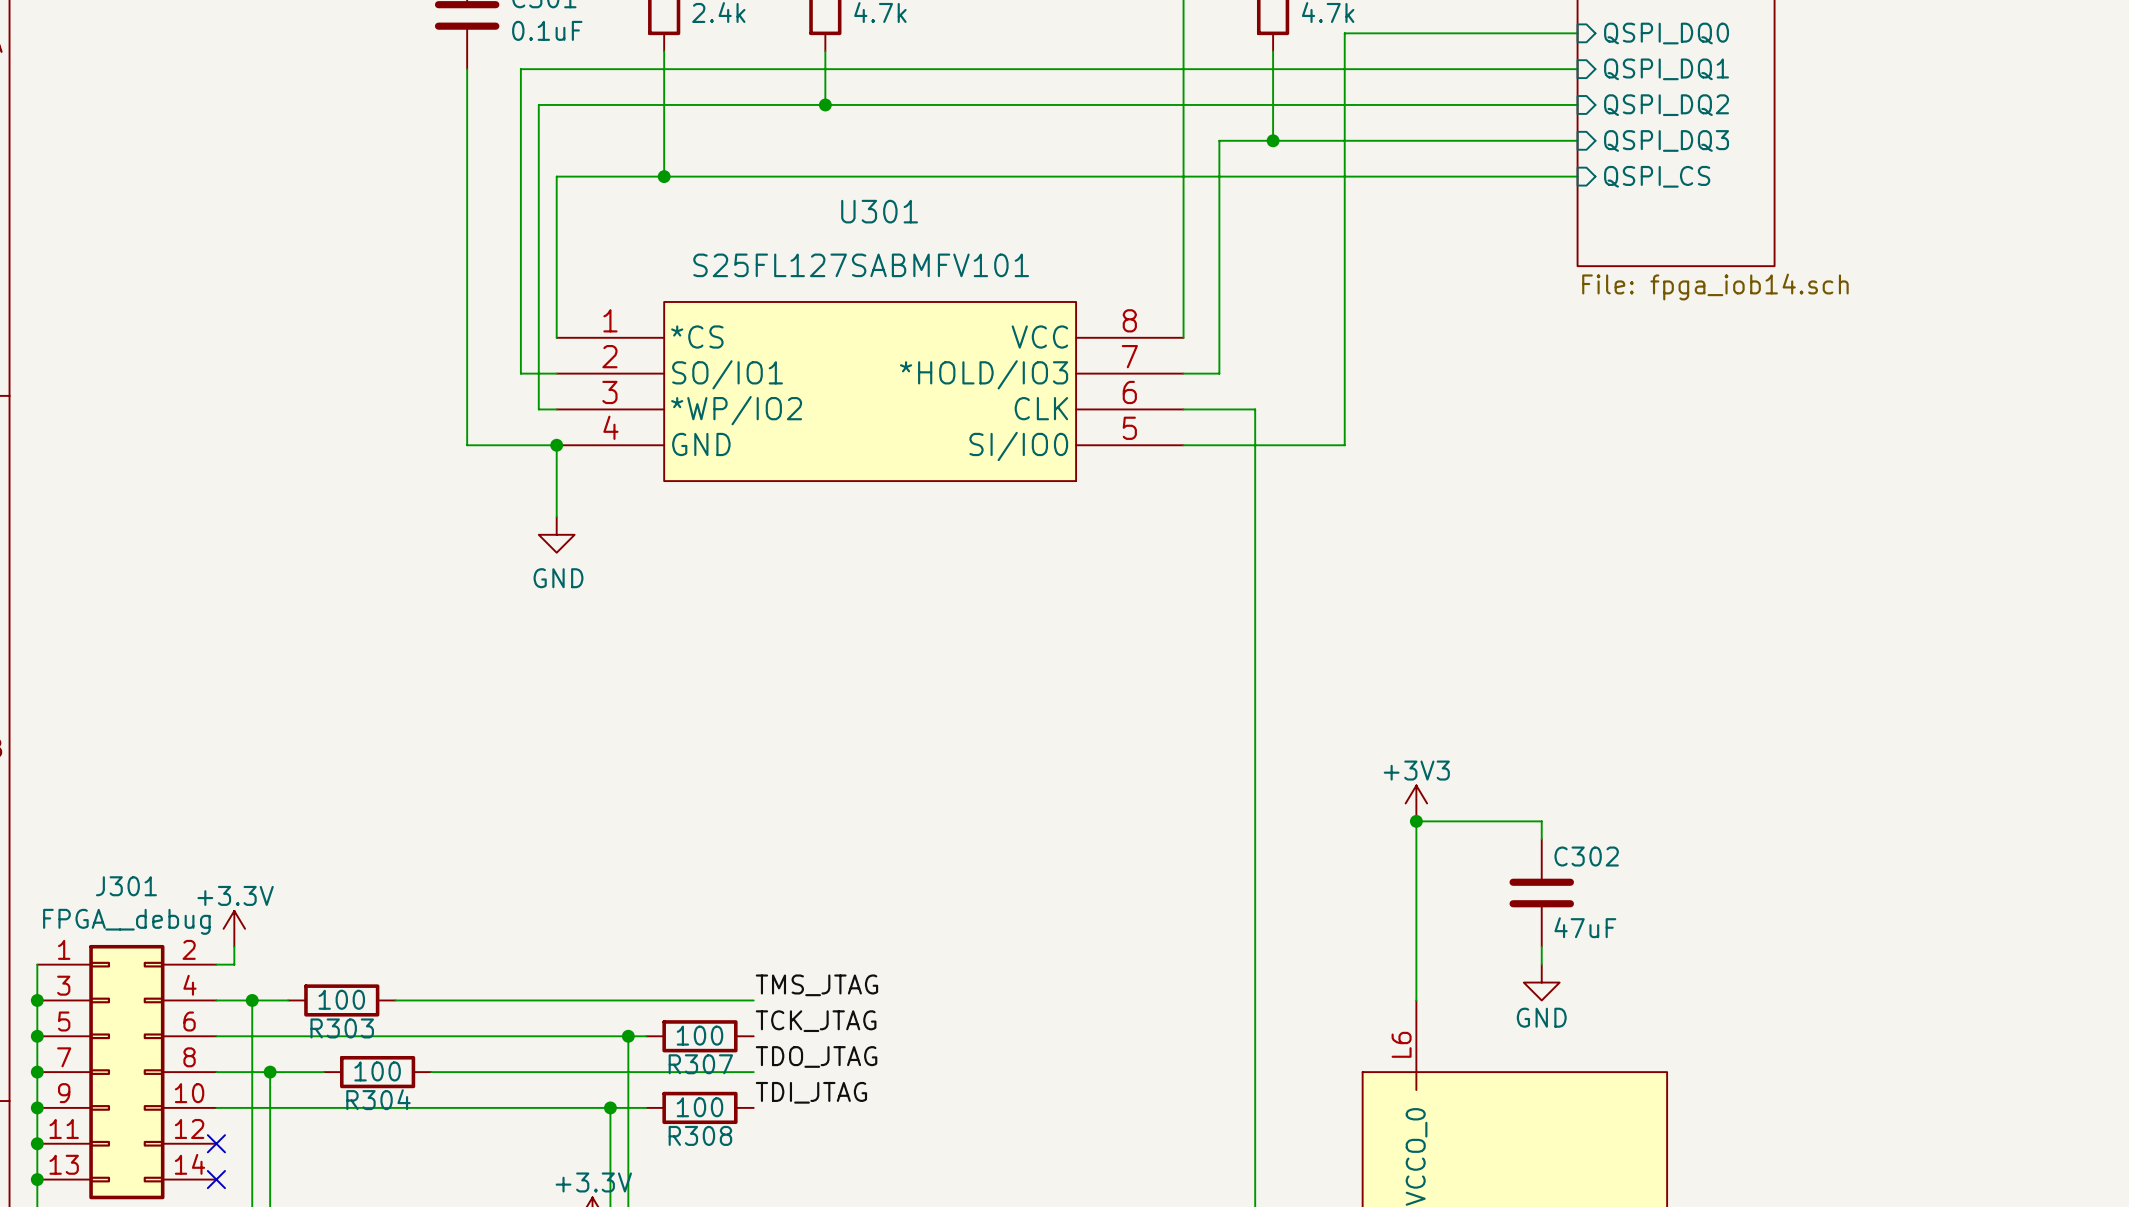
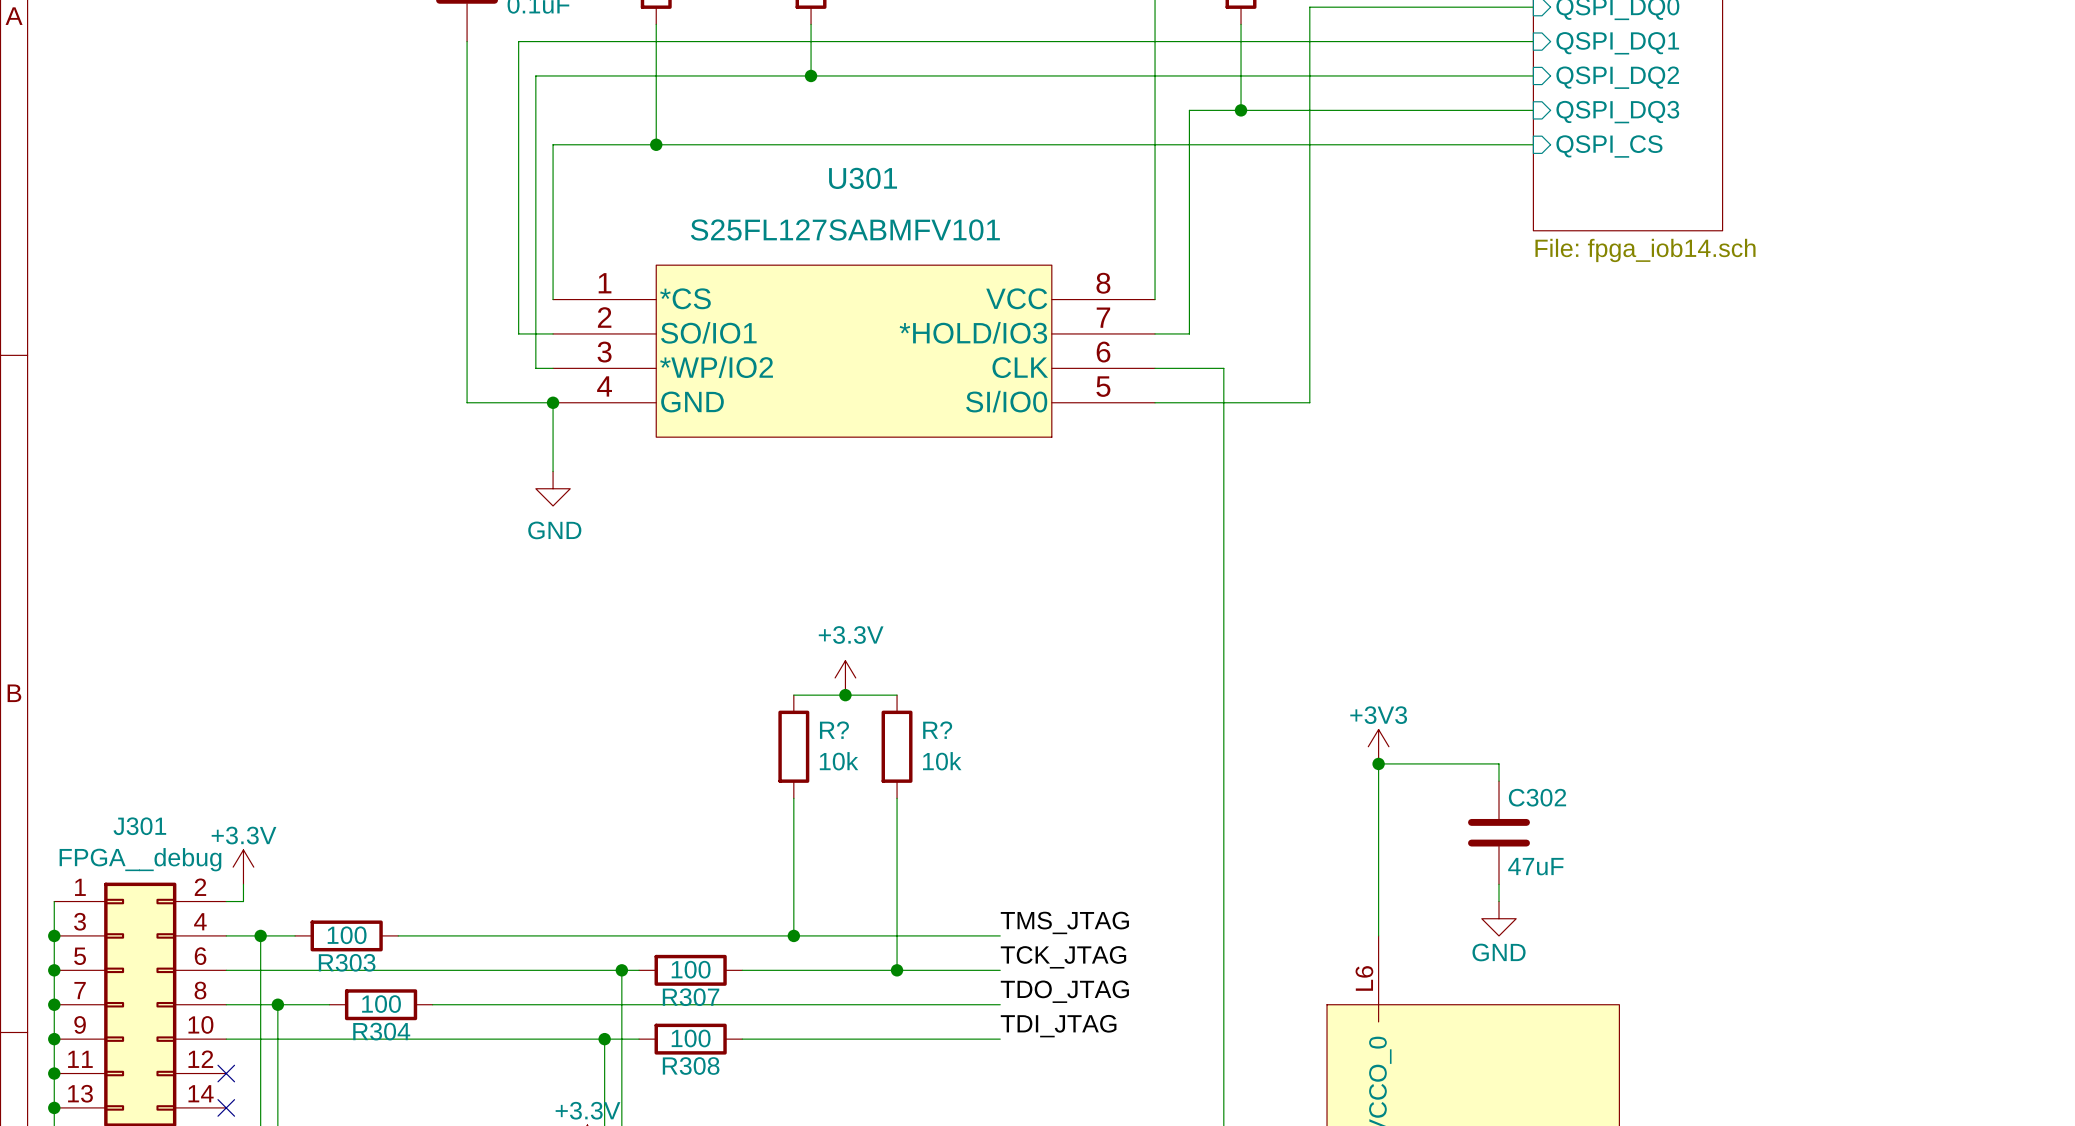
power symbol: none -> +3.3V (845, 677)
wire: none -> (793, 695) (897, 695)
junction: none -> (845, 695)
R?: none -> 10k (793, 746)
R?: none -> 10k (897, 746)
wire: none -> (793, 798) (793, 935)
wire: none -> (897, 798) (897, 970)
label position: TMS_JTAG (816, 985) -> TMS_JTAG (1064, 922)
wire: none -> (742, 935) (1000, 935)
junction: none -> (793, 935)
label position: TCK_JTAG (816, 1021) -> TCK_JTAG (1063, 957)
wire: none -> (742, 970) (1000, 970)
junction: none -> (897, 970)
label position: TDO_JTAG (816, 1056) -> TDO_JTAG (1064, 991)
wire: none -> (742, 1004) (1000, 1004)
label position: TDI_JTAG (811, 1092) -> TDI_JTAG (1058, 1026)
wire: none -> (742, 1039) (1000, 1039)

